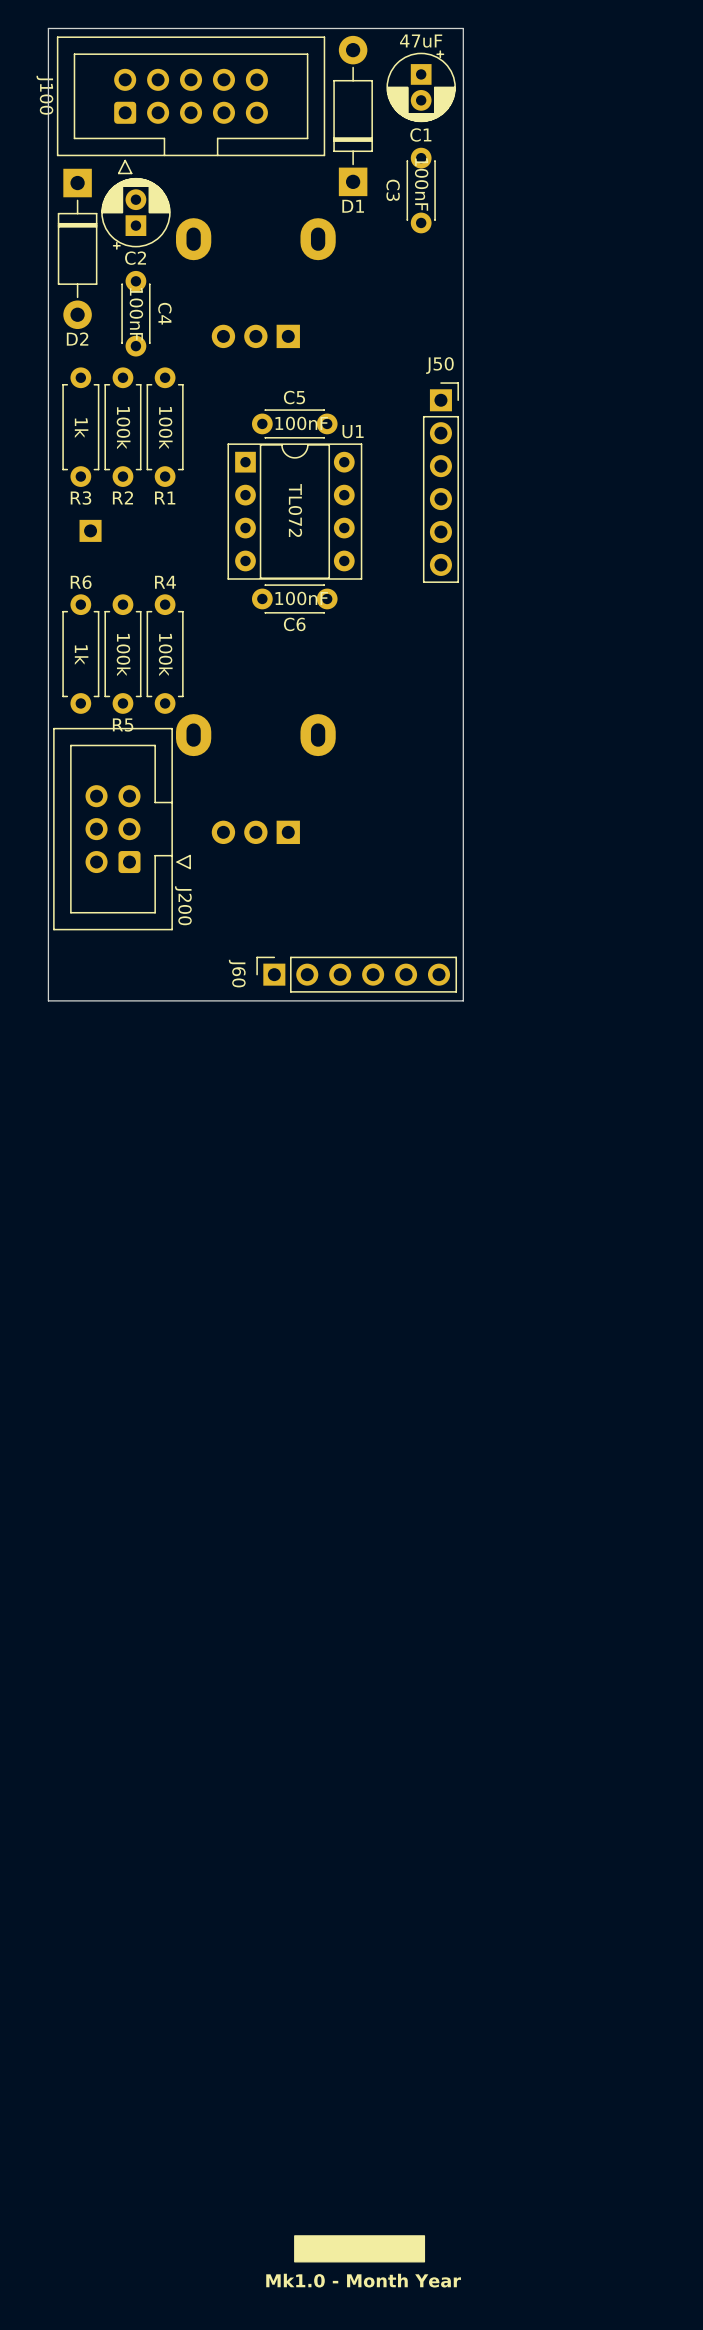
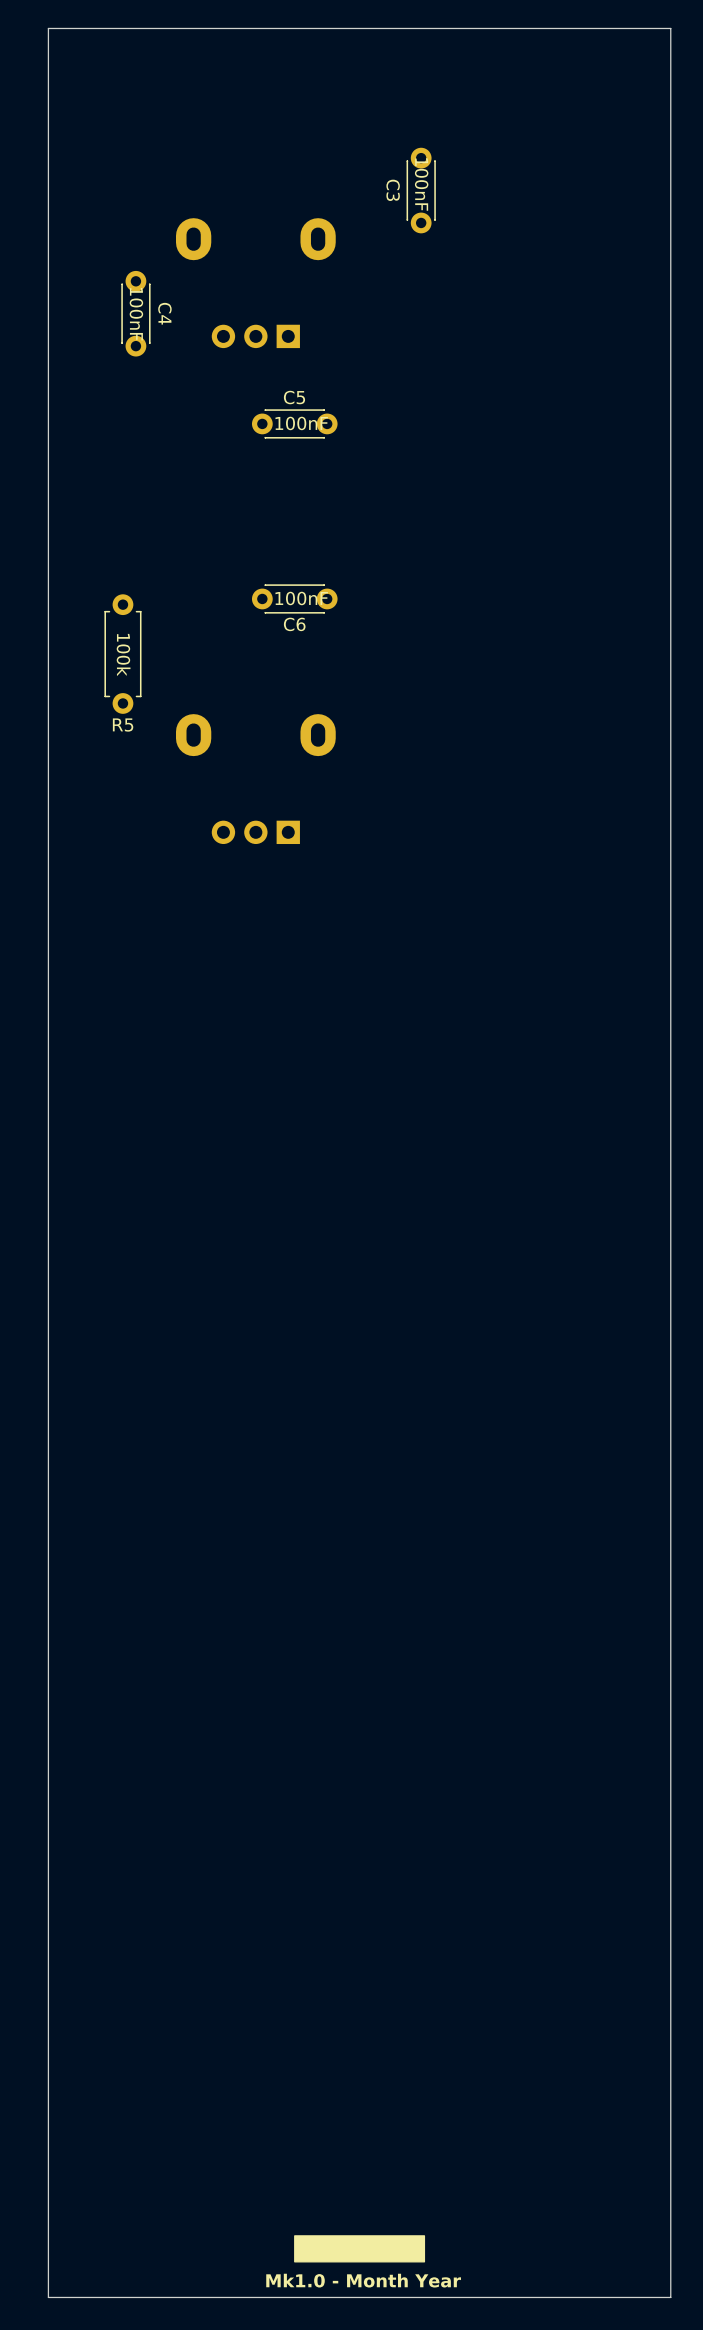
board edge: (463, 28) (463, 1000) (48, 1000) -> (463, 28) (670, 28) (670, 2297) (48, 2297) (48, 1000)
C1: 47uF (421, 86) -> none
J100: (191, 105) -> none
D1: (353, 115) -> none
C2: (135, 213) -> none
D2: (77, 248) -> none
R3: 1k (80, 427) -> none
R2: 100k (122, 427) -> none
R1: 100k (165, 427) -> none
J50: (440, 482) -> none
U1: TL072 (294, 511) -> none
part: (90, 530) -> none
R6: 1k (80, 654) -> none
R4: 100k (165, 654) -> none
J200: (122, 829) -> none
J60: (356, 974) -> none

